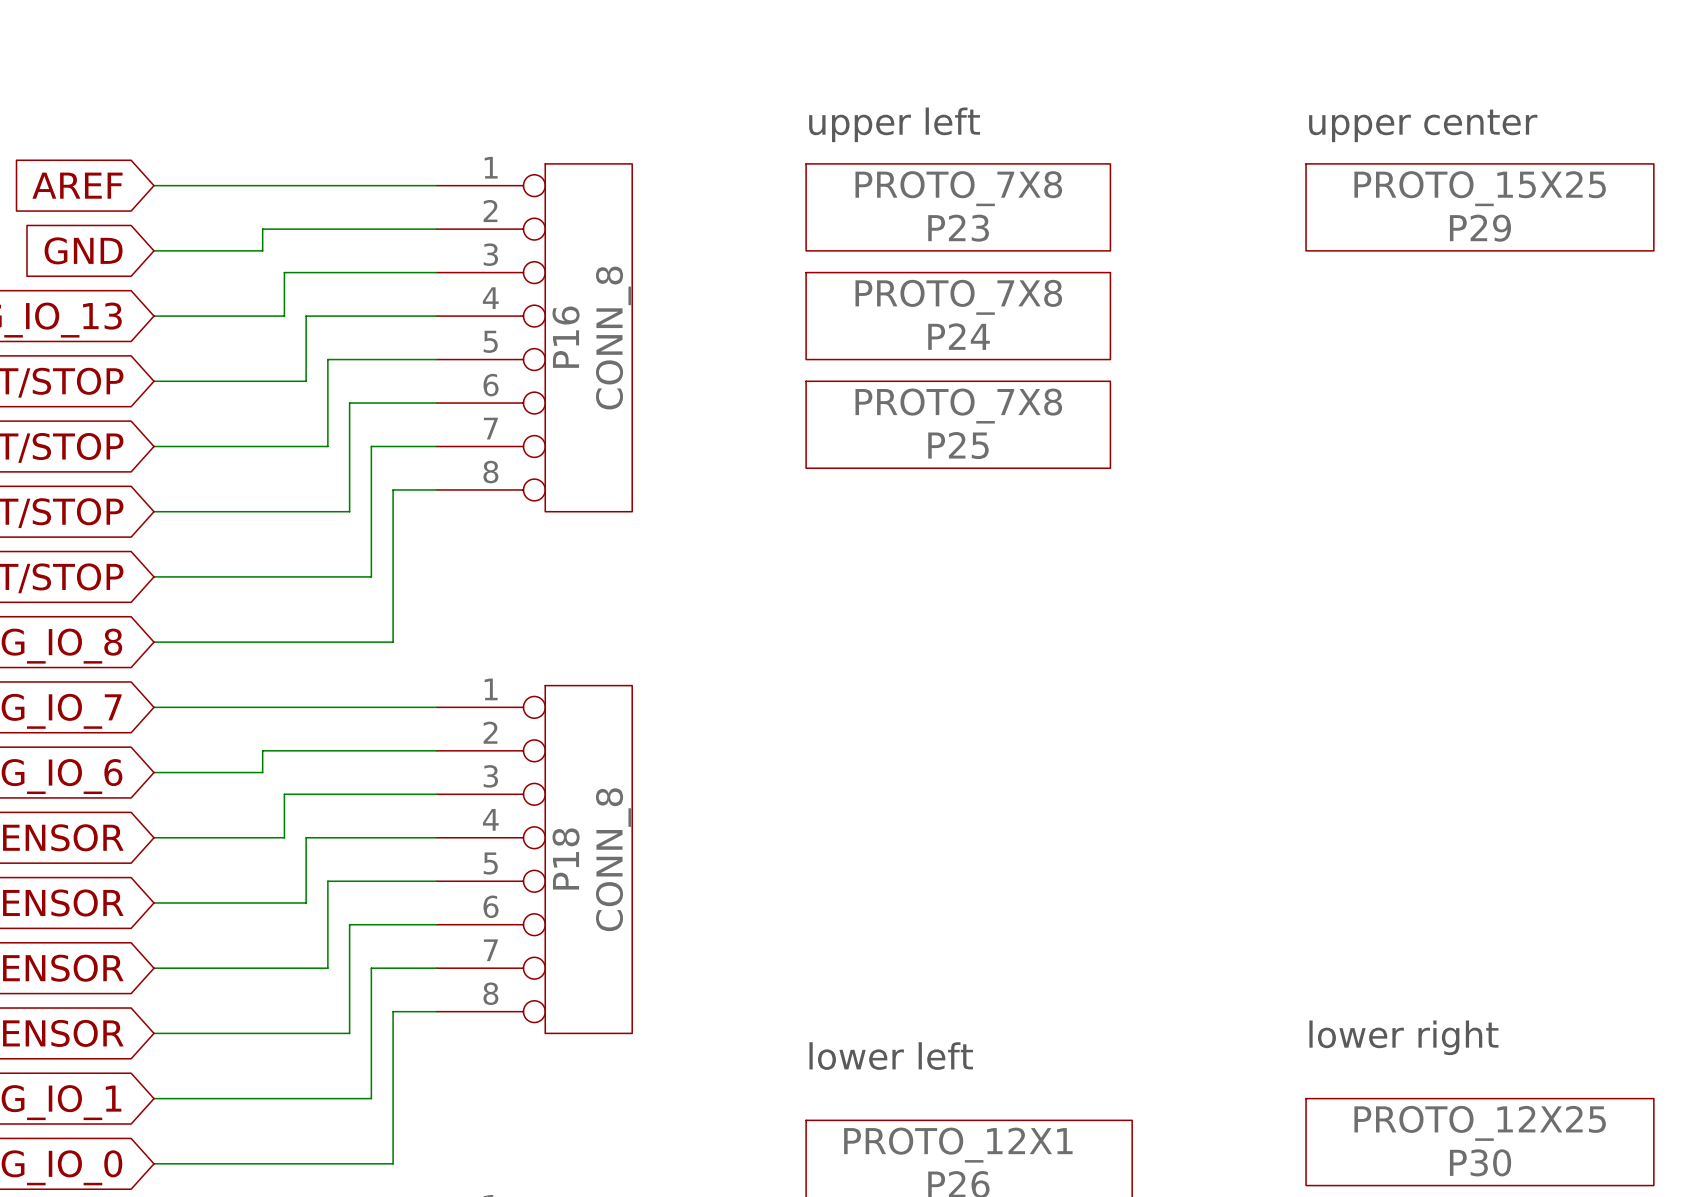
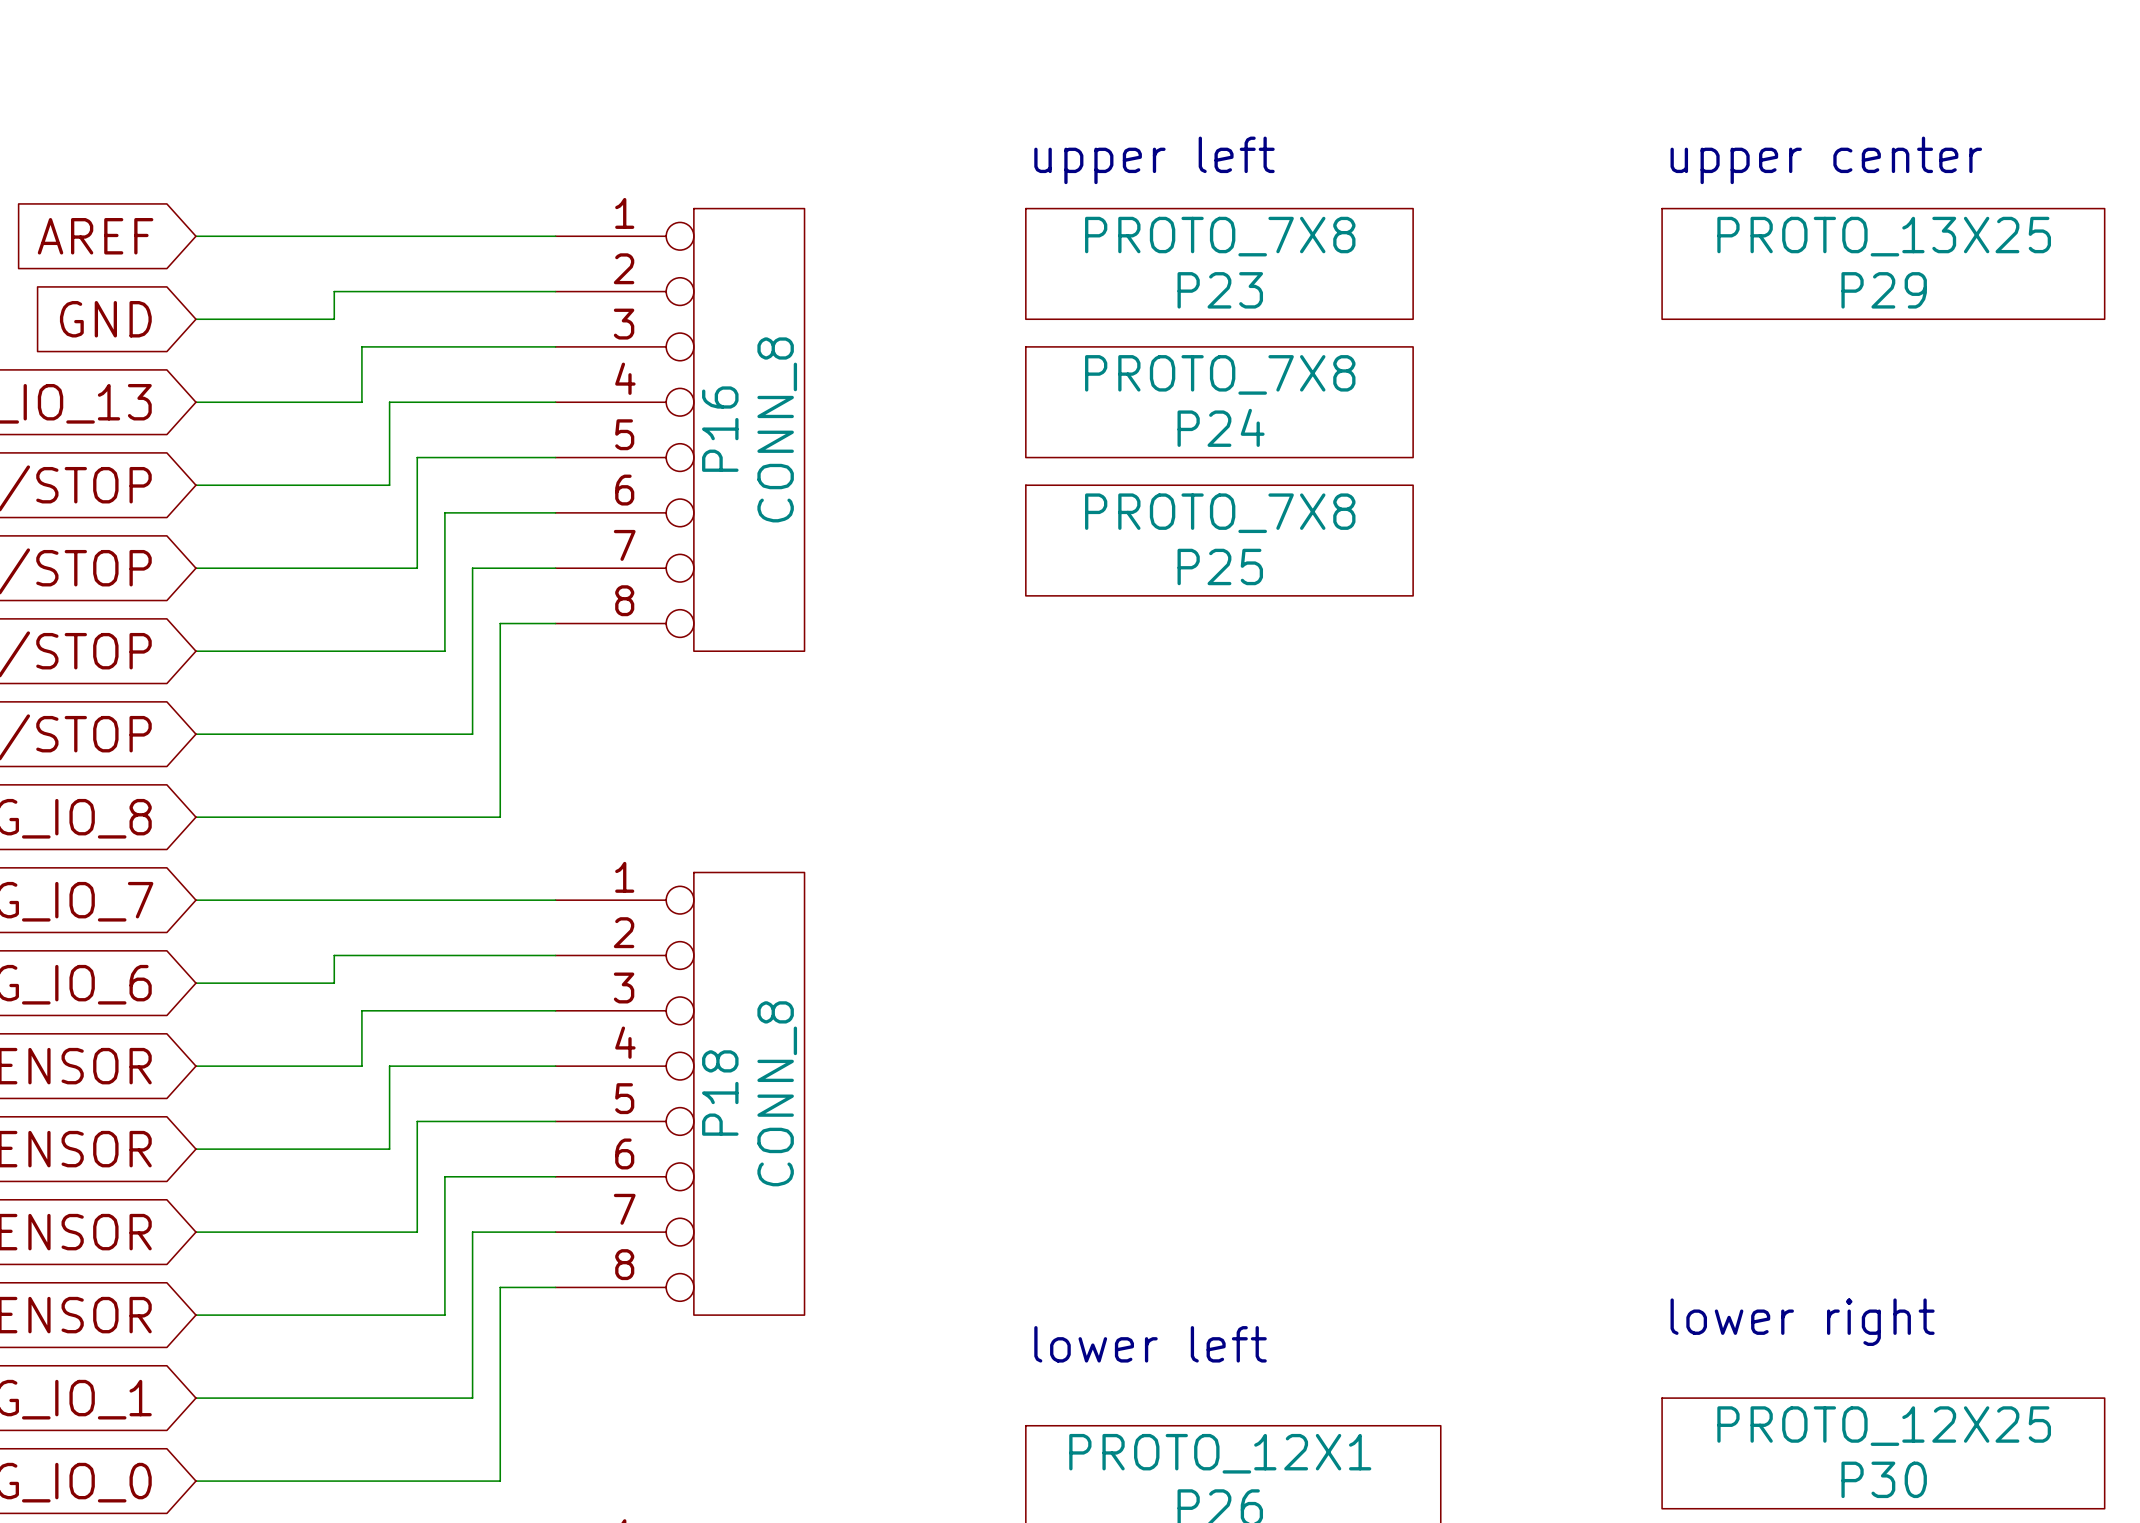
P29 value: PROTO_15X25 (1480, 188) -> PROTO_13X25 (1884, 236)

